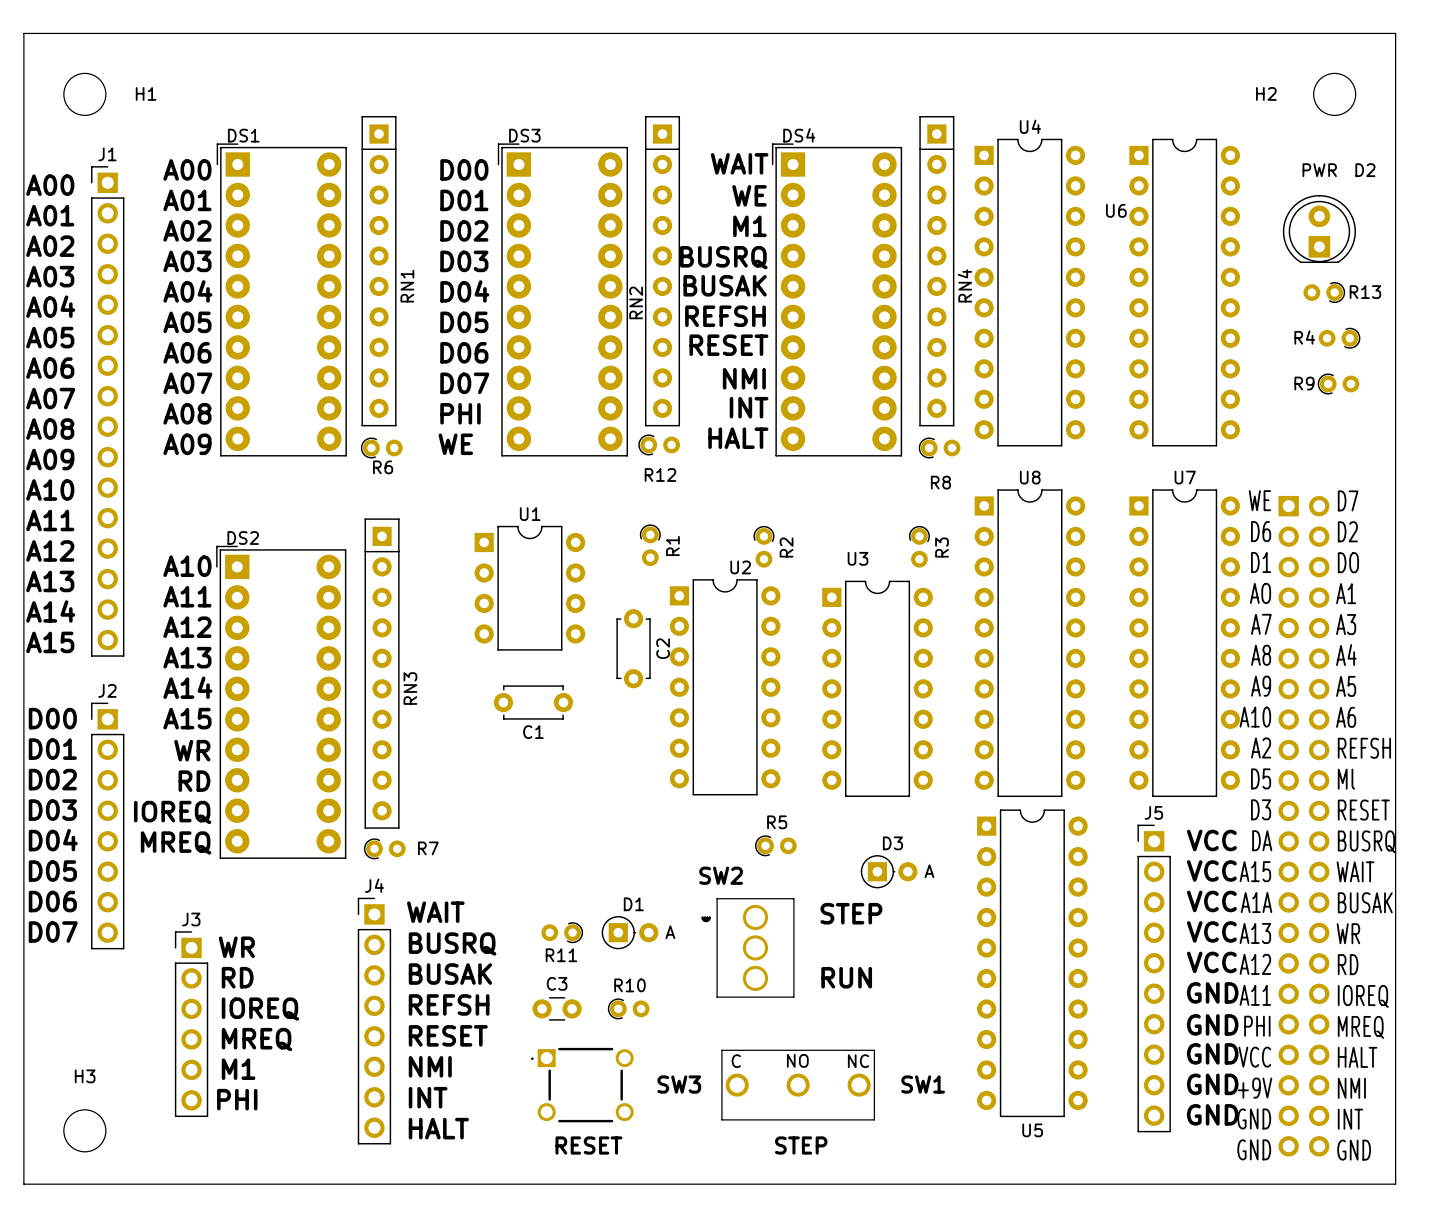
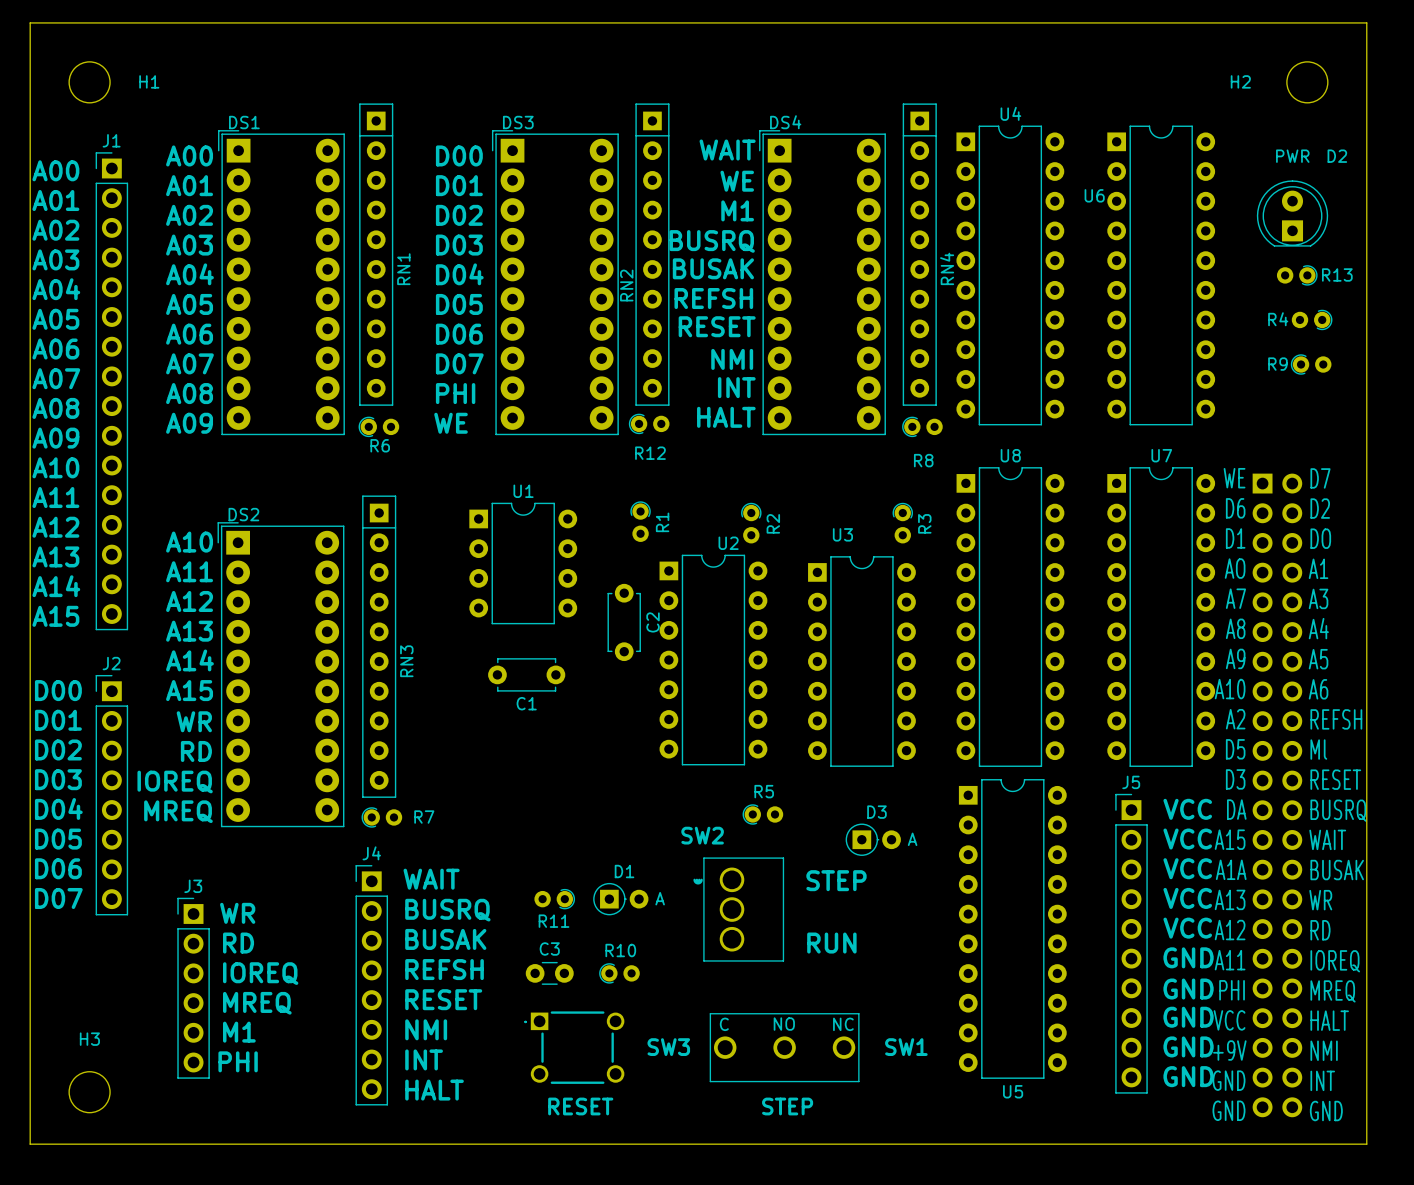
SW2 footprint: [701, 898, 795, 998] -> [693, 857, 785, 962]

